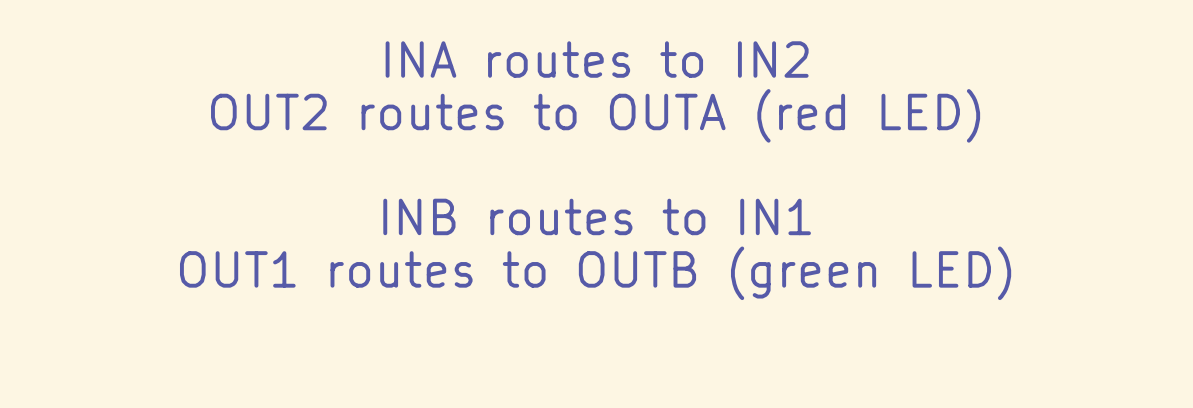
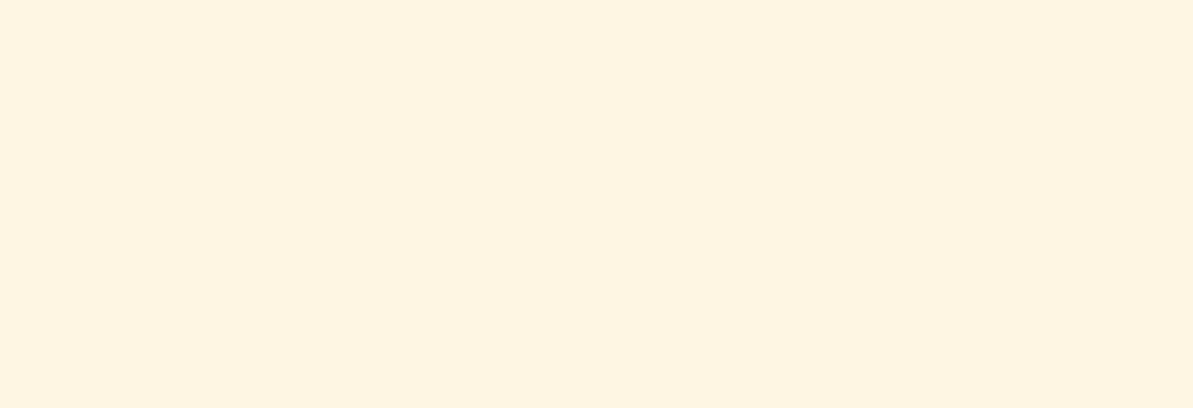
text: INA routes to IN2 (597, 59) -> none
text: OUT2 routes to OUTA (red LED) (595, 115) -> none
text: INB routes to IN1 (597, 216) -> none
text: OUT1 routes to OUTB (green LED) (595, 273) -> none

